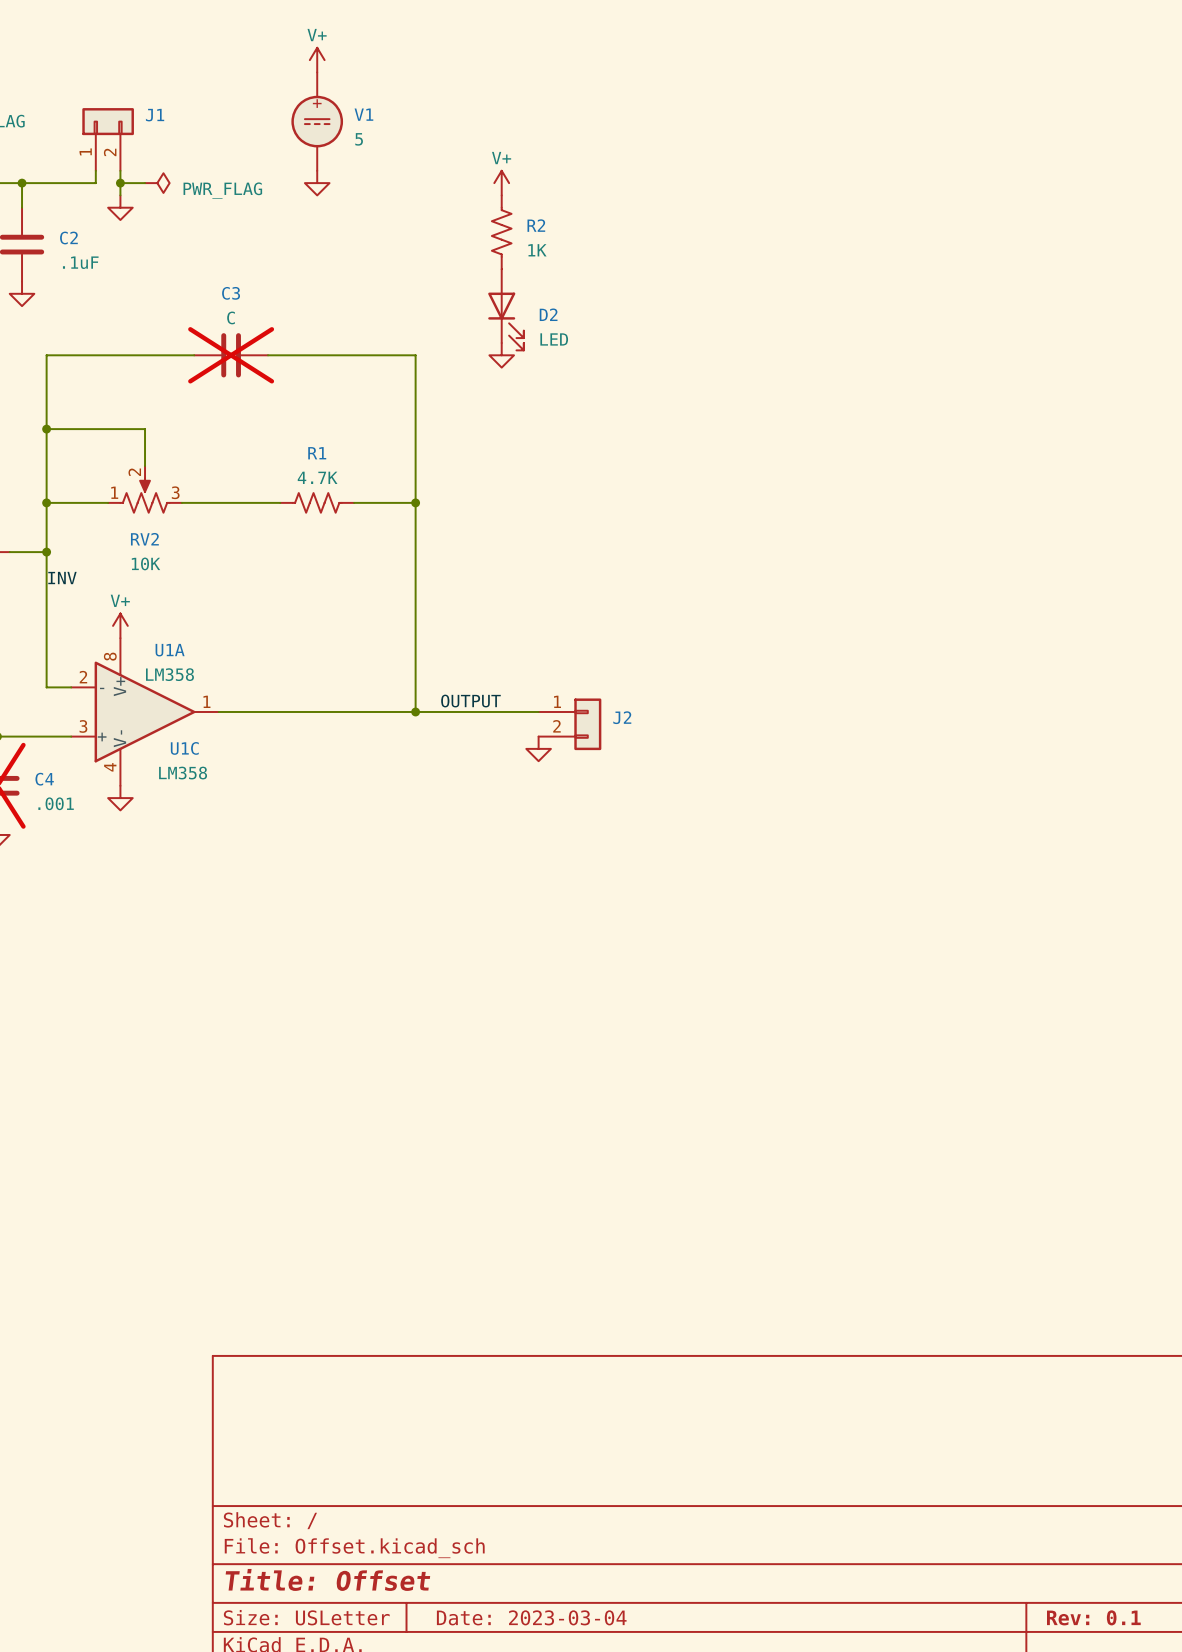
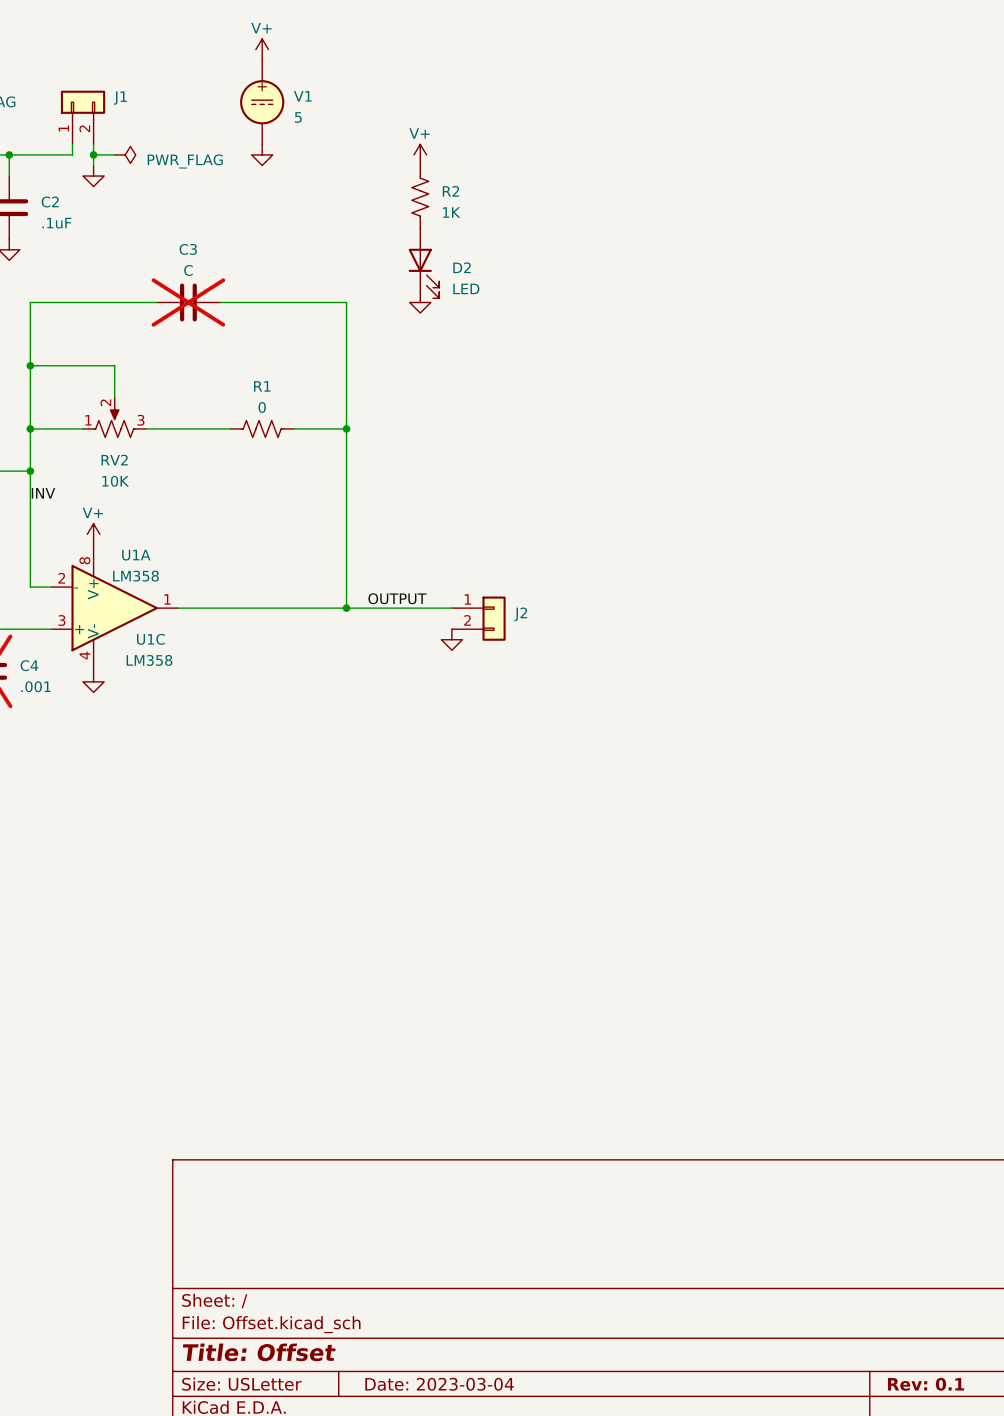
R1 value: 4.7K (317, 477) -> 0 (262, 407)

